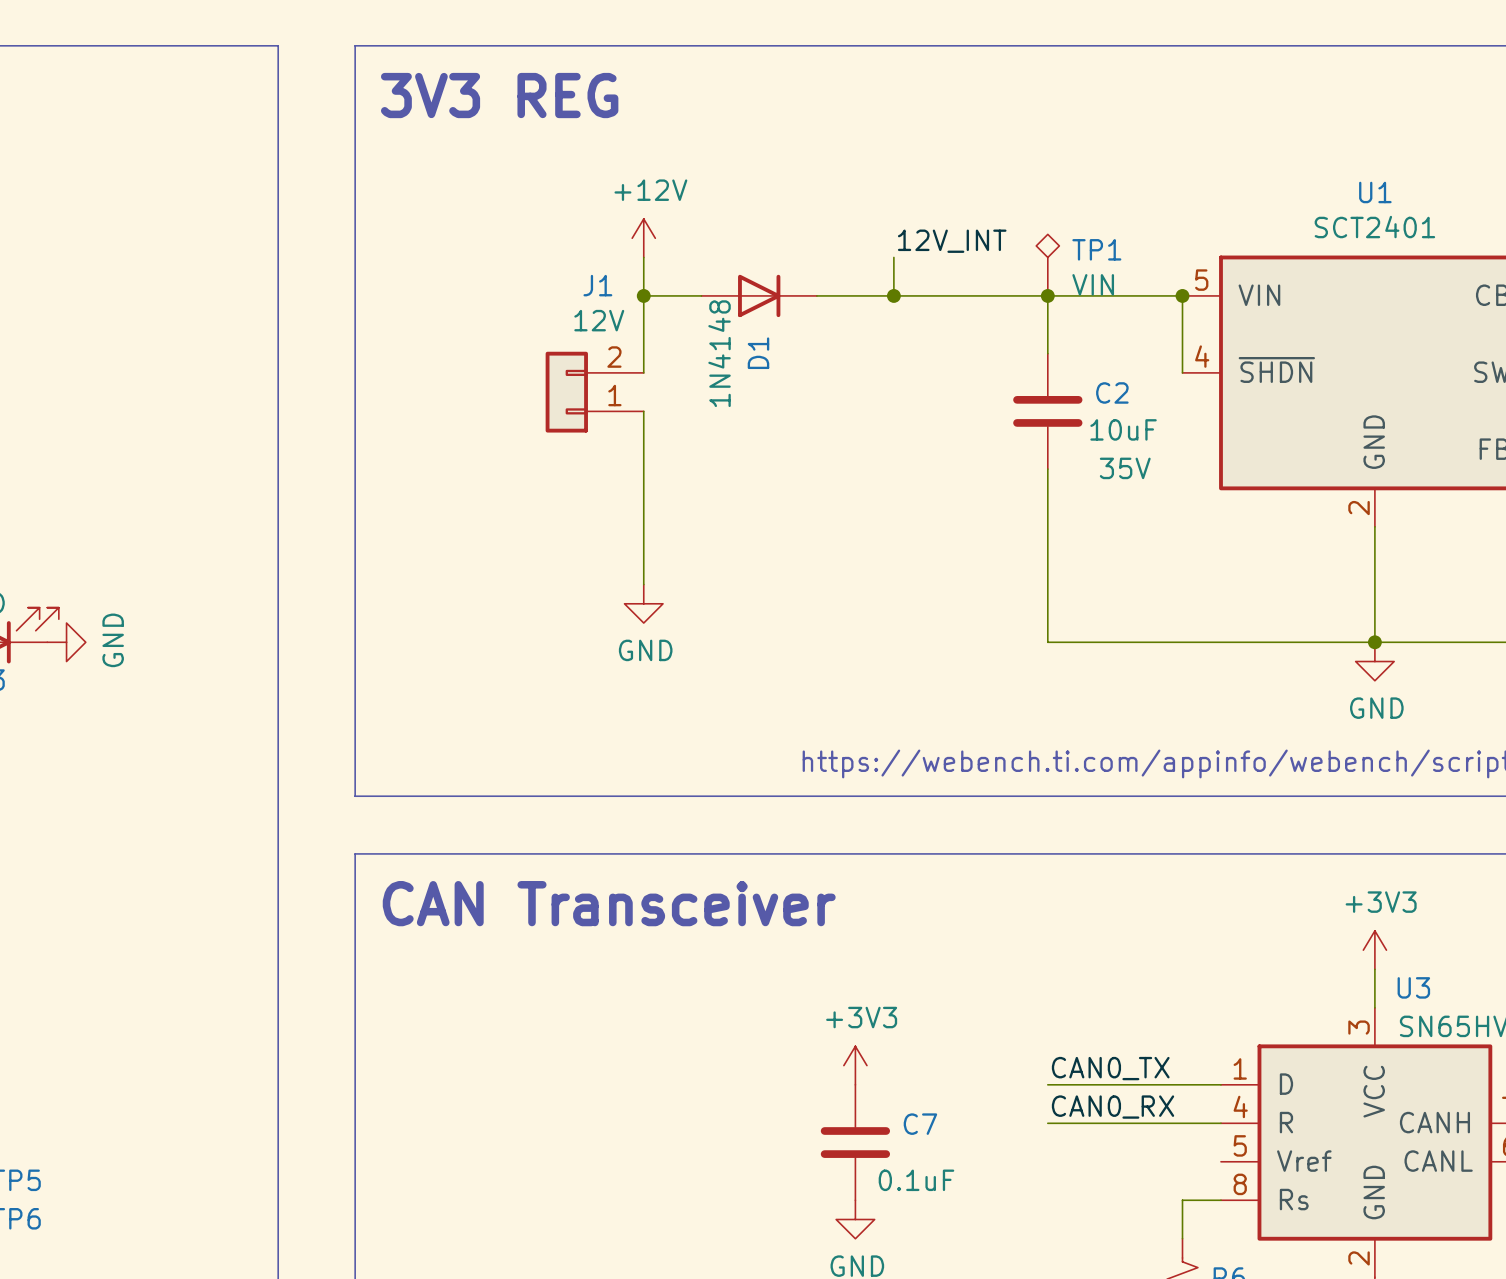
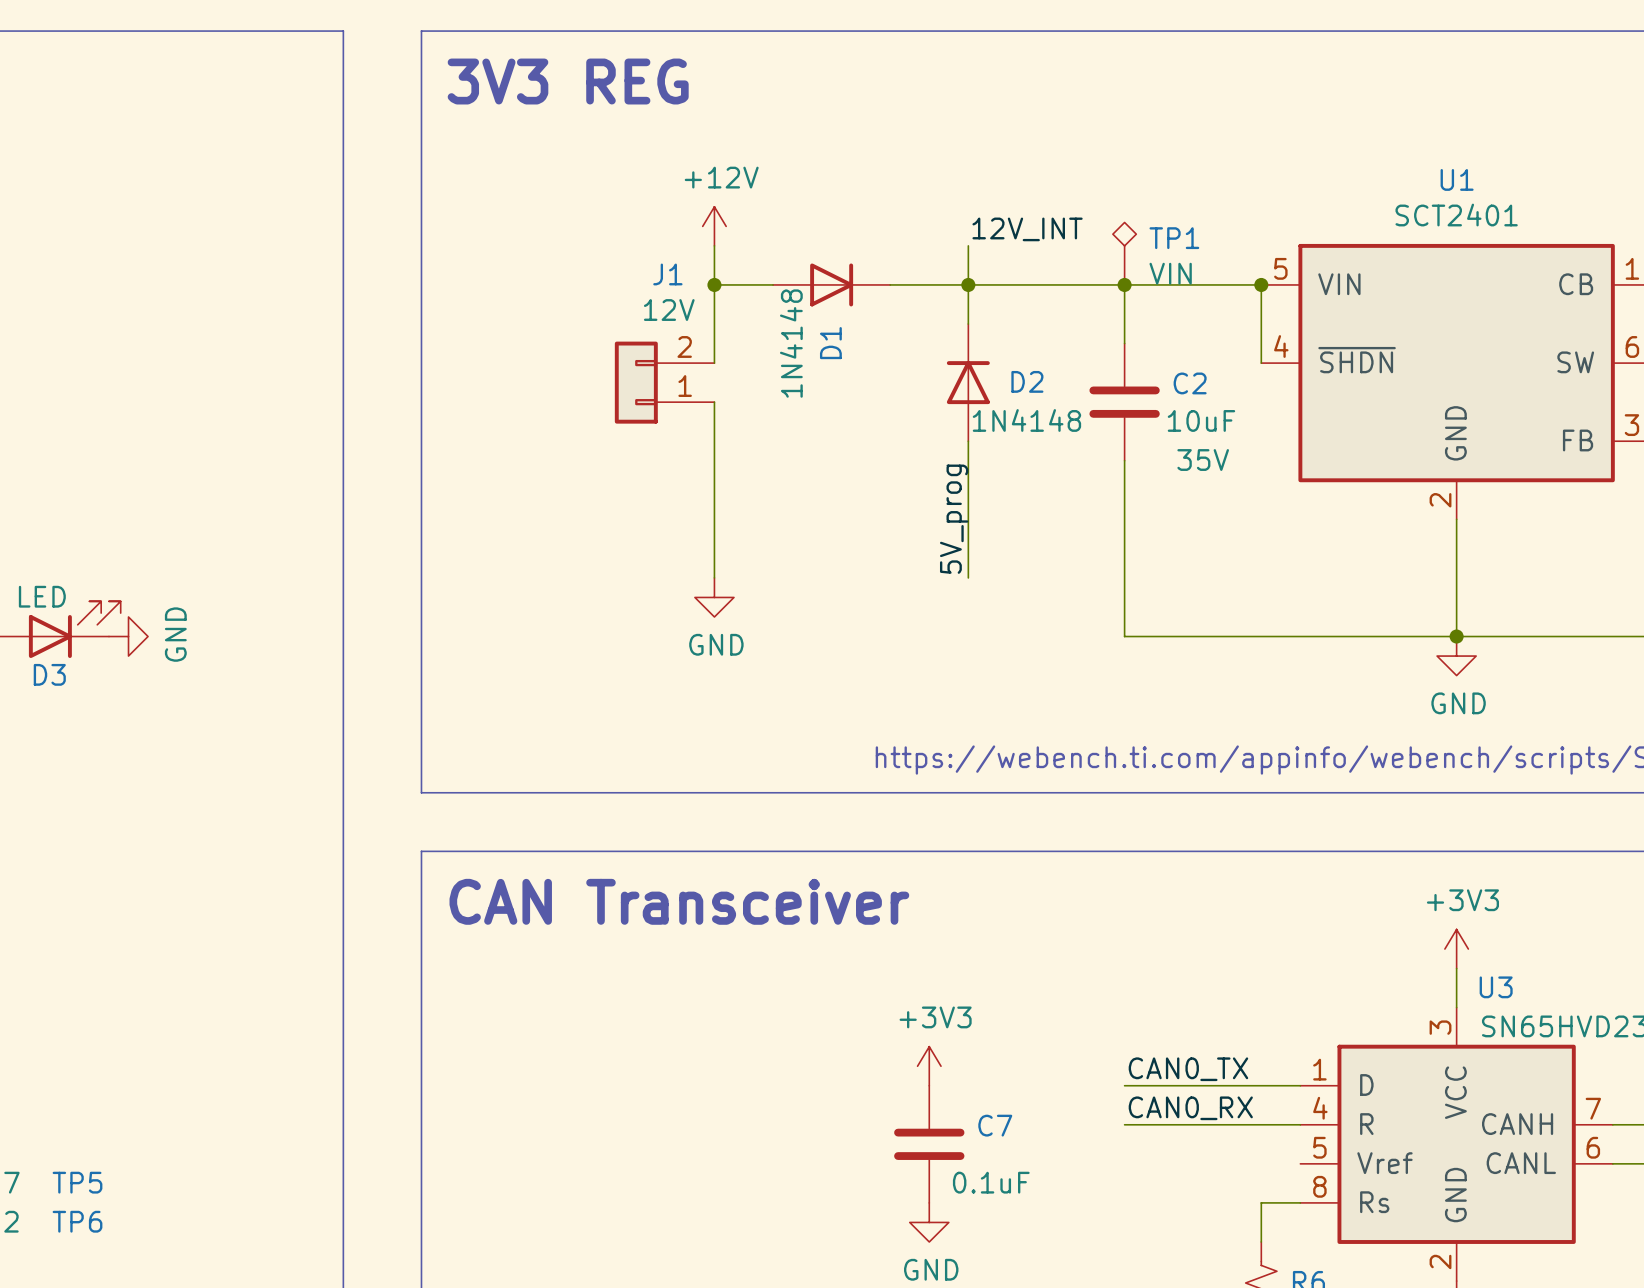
wire: none -> (968, 284) (968, 324)
D2: none -> 1N4148 (968, 382)
wire: none -> (968, 441) (968, 577)
label: none -> 5V_prog (954, 519)

